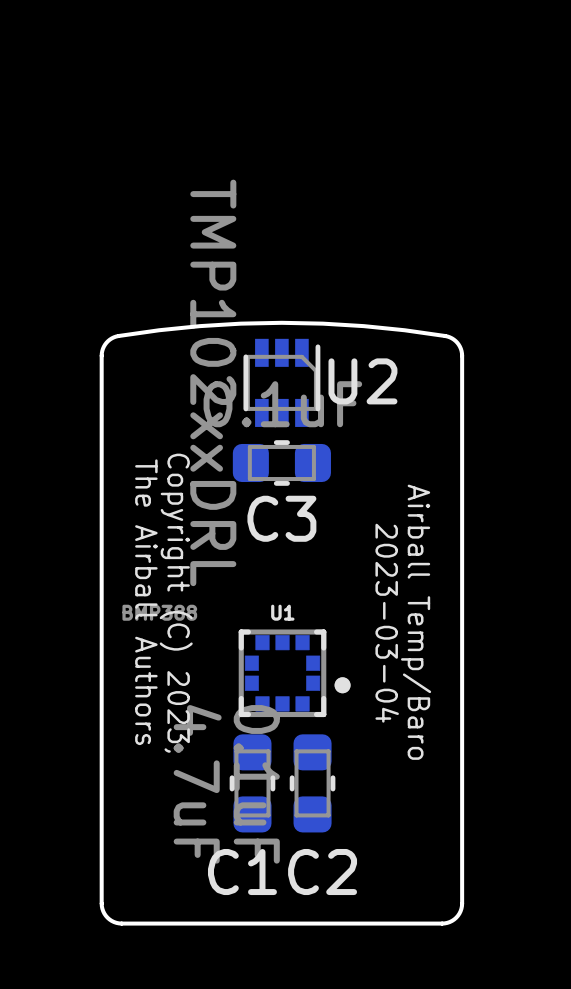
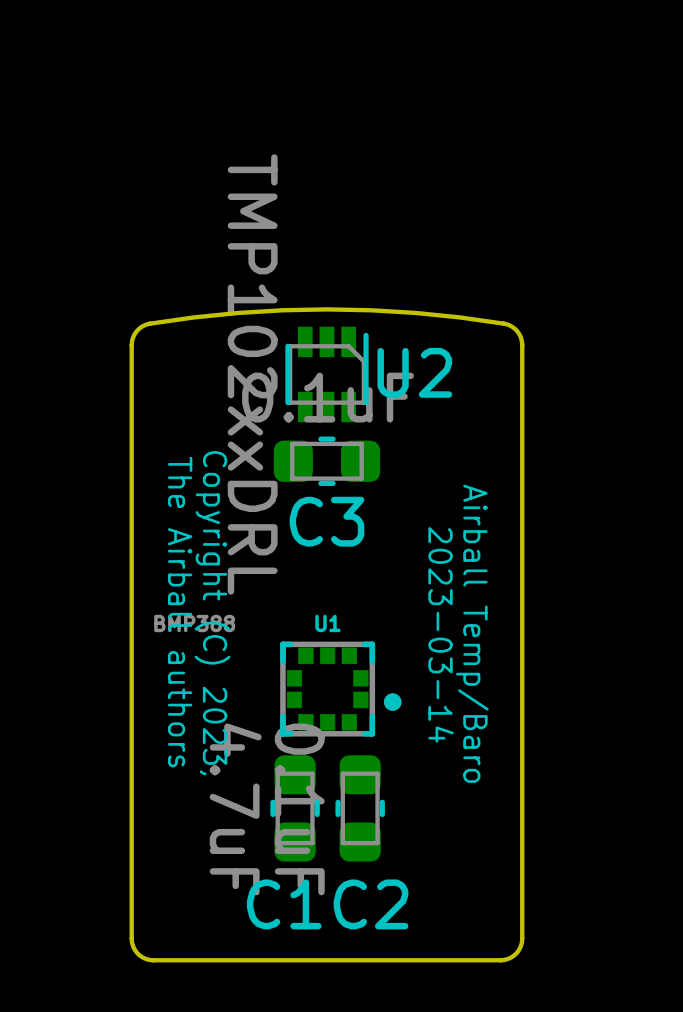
text: The Airball Authors (146, 602) -> The Airball authors (180, 612)
text: 2023-03-04 (387, 623) -> 2023-03-14 (441, 634)

